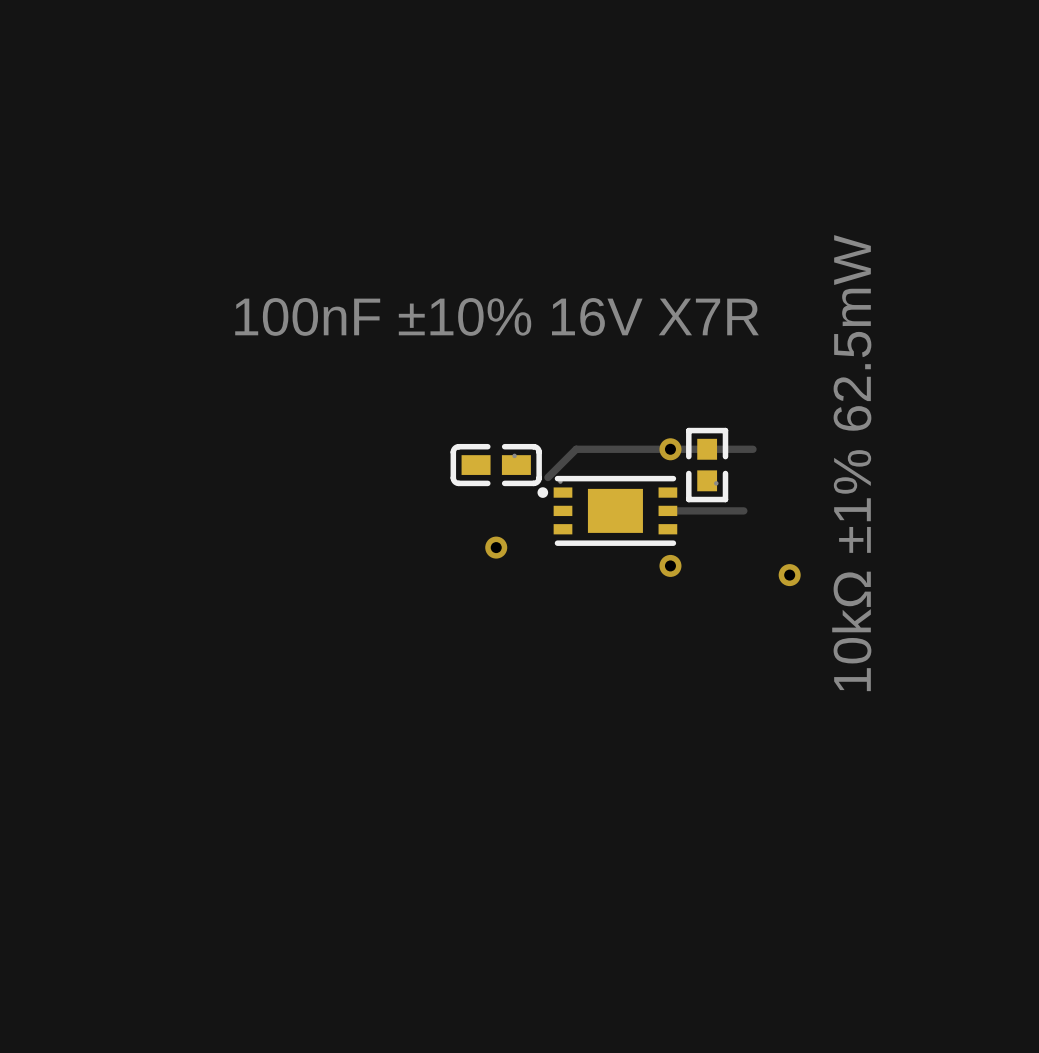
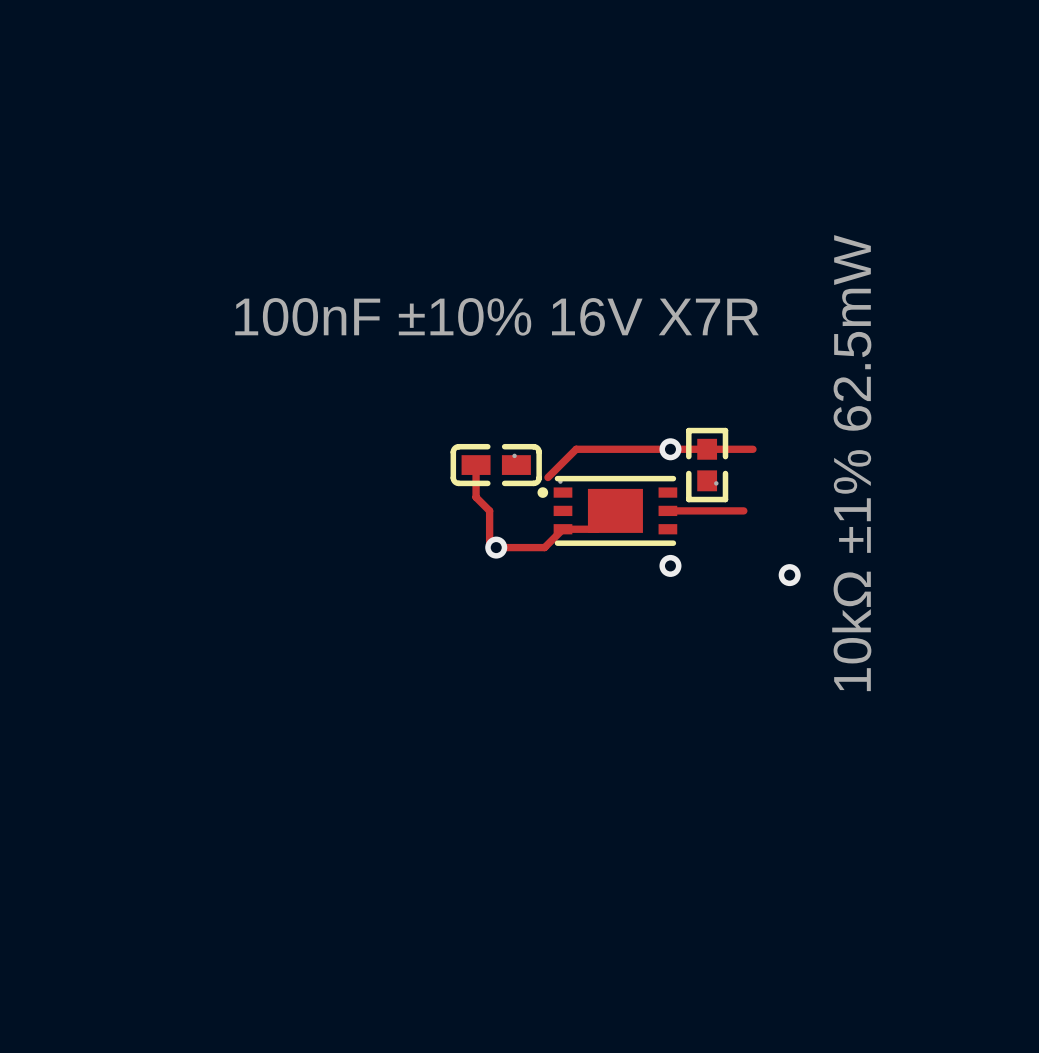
track: none -> (476, 465) (476, 497) (489, 510) (489, 540) (496, 547) (544, 547) (562, 529) (597, 529) (615, 510)

